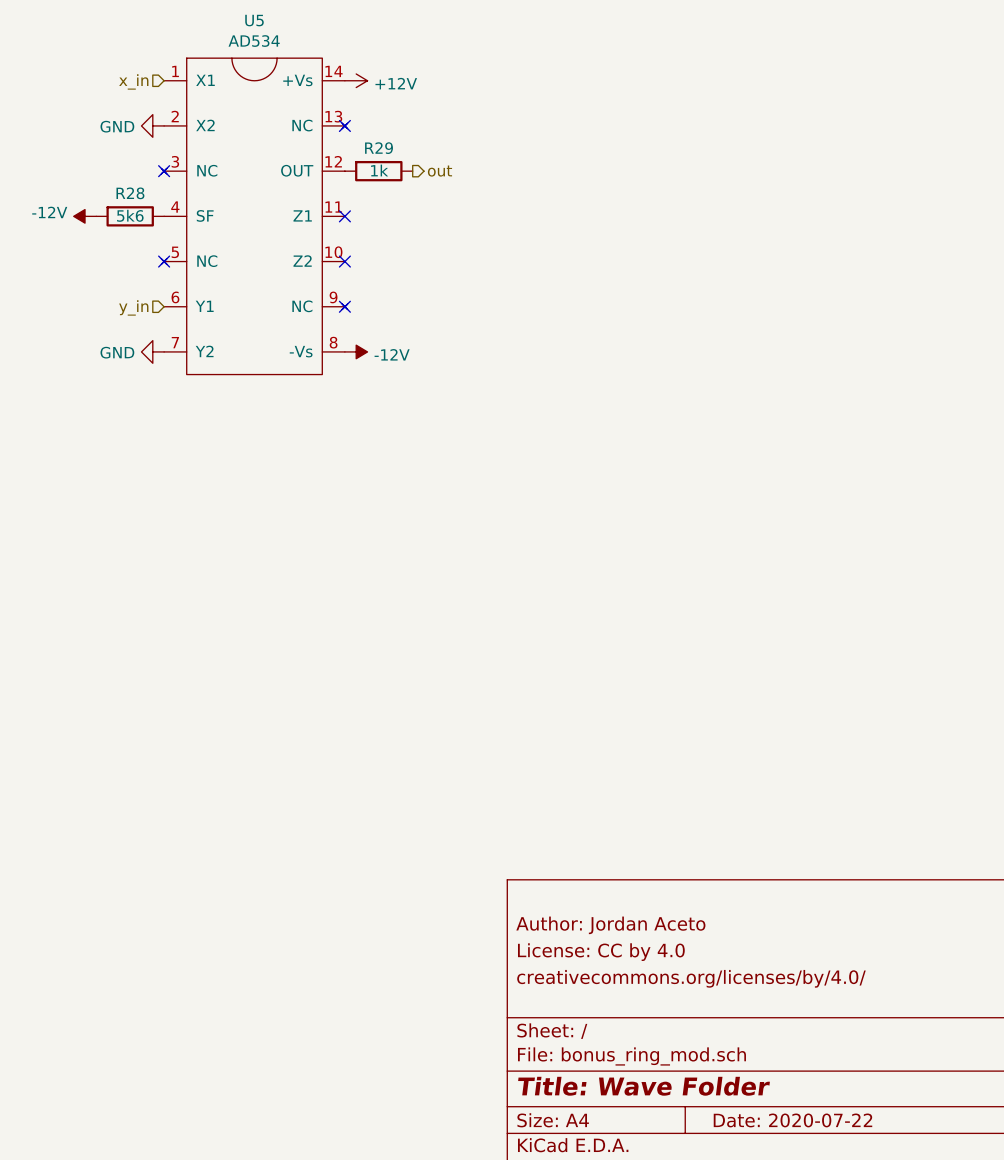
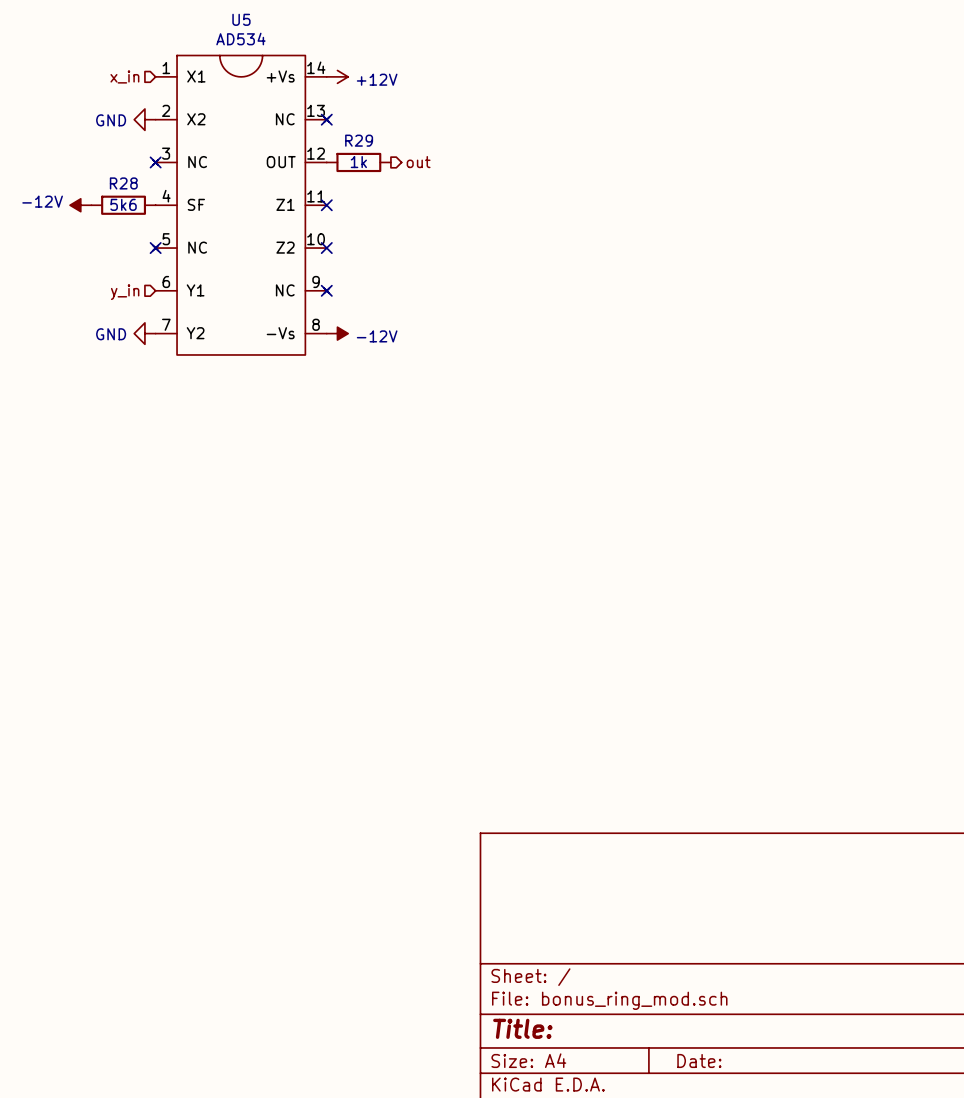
title block: Author: Jordan Aceto (610, 925) -> none
title block: License: CC by 4.0 (601, 952) -> none
title block: creativecommons.org/licenses/by/4.0/ (691, 978) -> none
title block: Title: Wave Folder (644, 1086) -> Title: (522, 1028)
title block: Date: 2020-07-22 (792, 1120) -> Date: (699, 1060)

